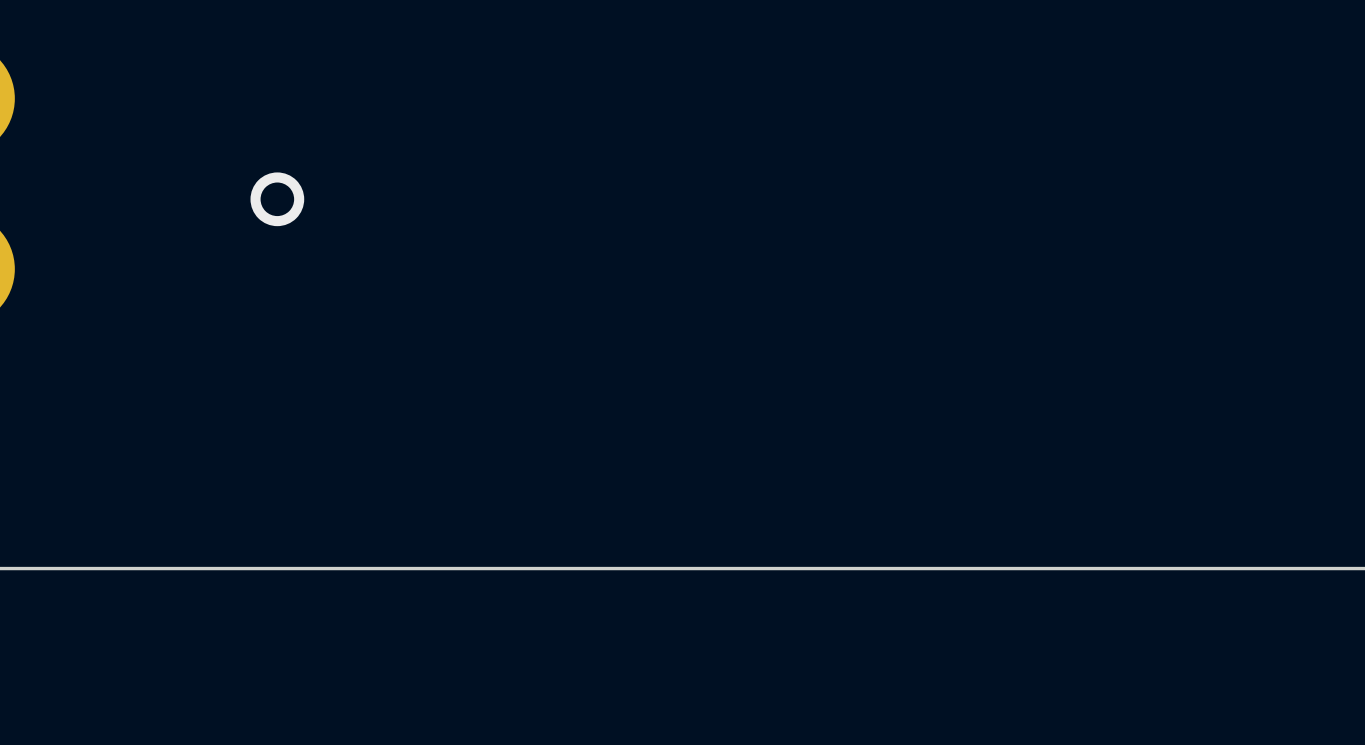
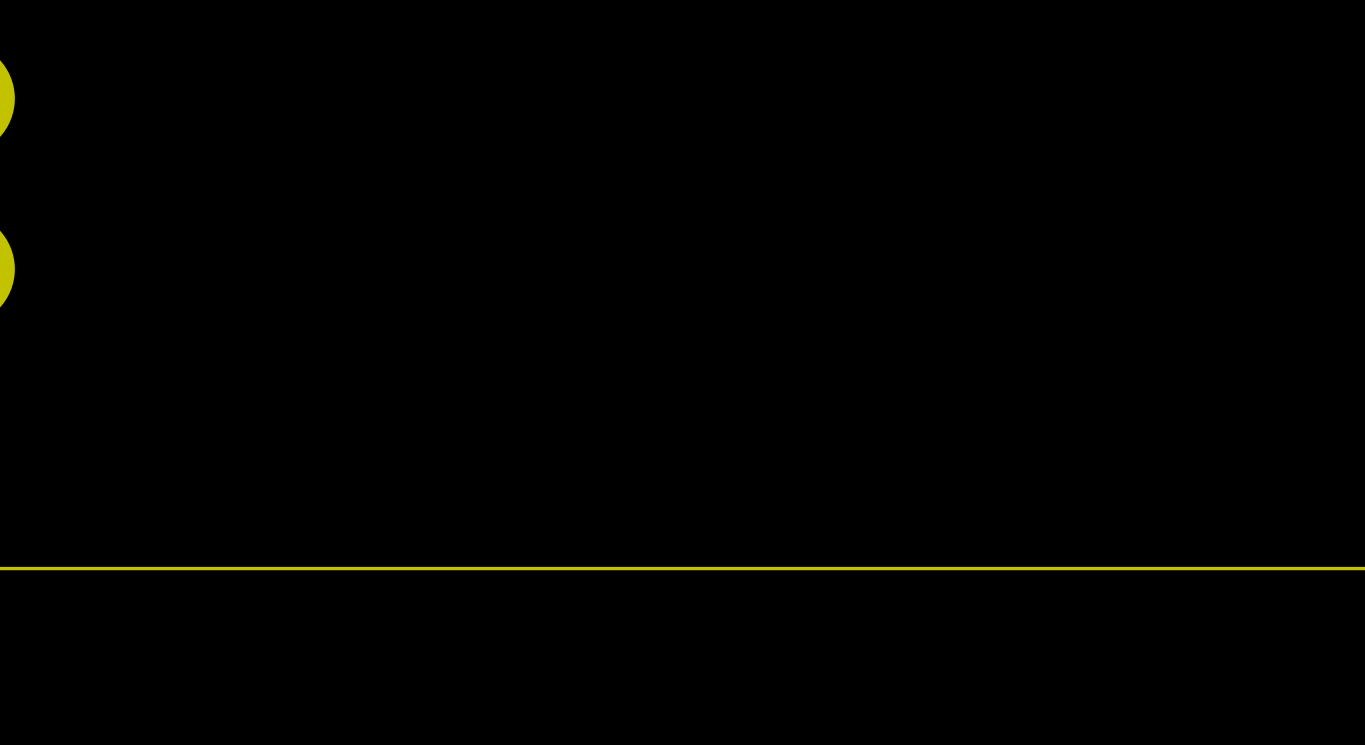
via: (277, 199) -> none

